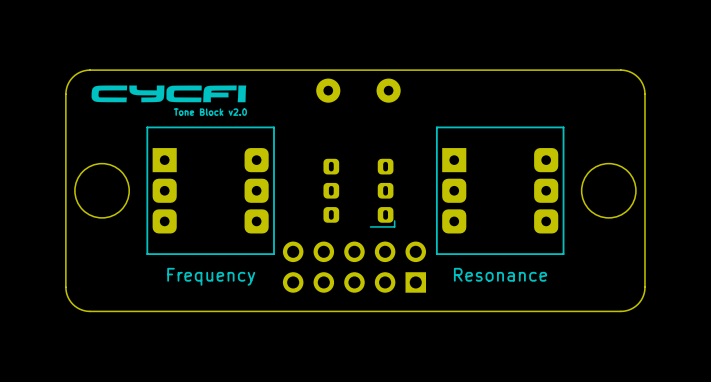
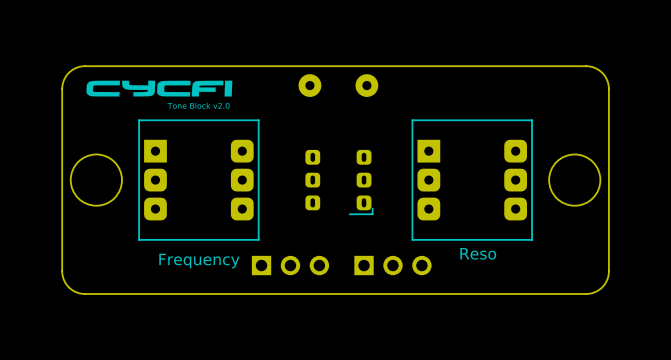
part: (354, 267) -> none
text: Resonance (500, 274) -> Reso (478, 253)
part: none -> (290, 265)
part: none -> (392, 265)

